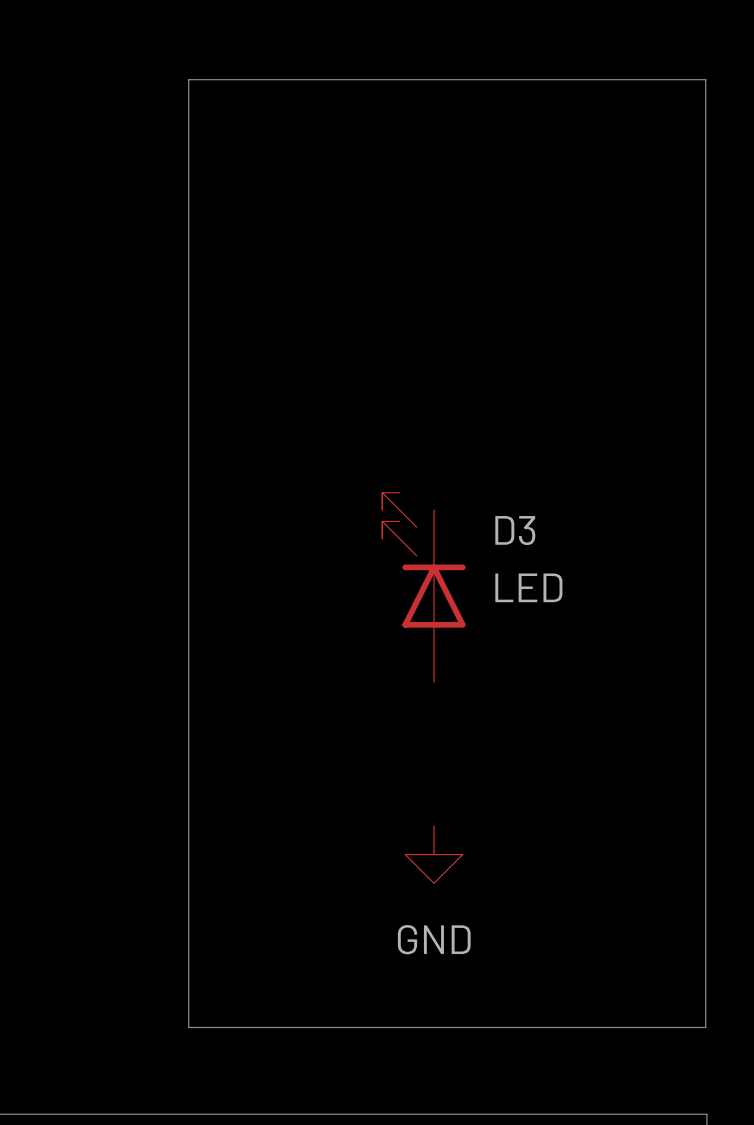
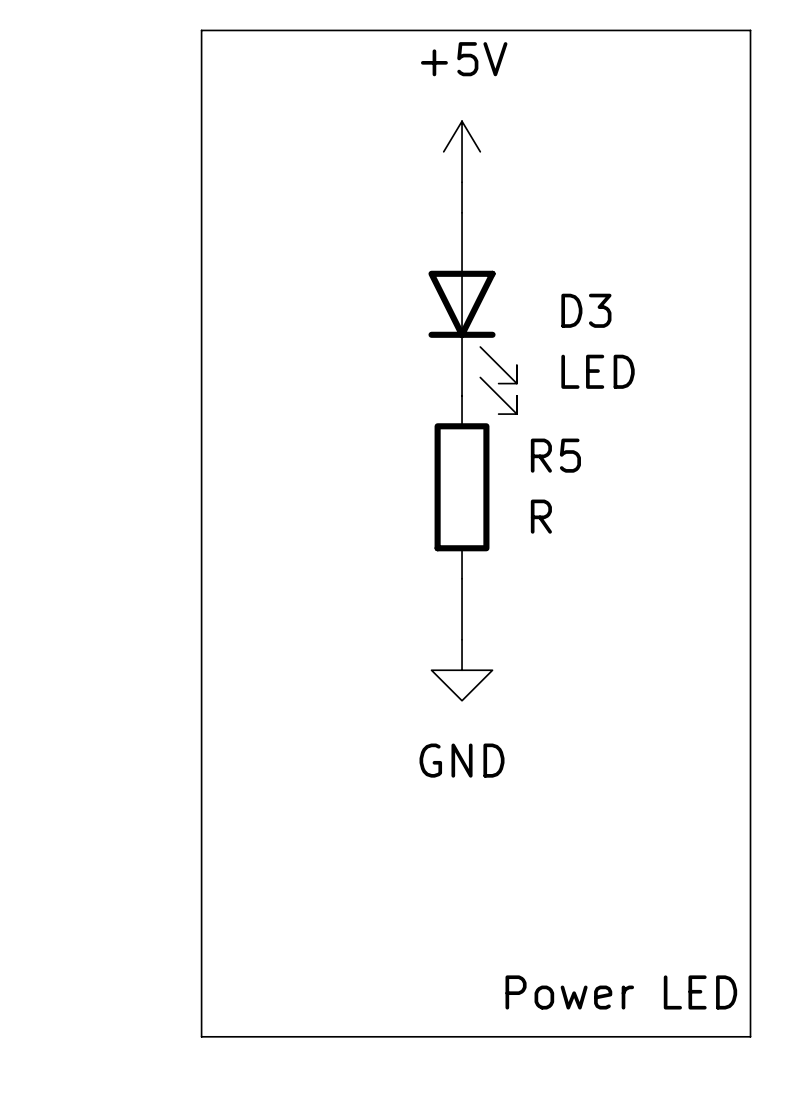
power symbol: none -> +5V (462, 151)
wire: none -> (462, 182) (462, 212)
R5: none -> R (462, 487)
D3 name position: D3 (515, 530) -> D3 (586, 310)
D3 rotation: 0° (423, 560) -> 180° (472, 342)
D3 position: (423, 587) -> (472, 313)
D3 value position: LED (528, 587) -> LED (598, 371)
power symbol position: GND (434, 854) -> GND (462, 670)
text: none -> Power LED (621, 992)

